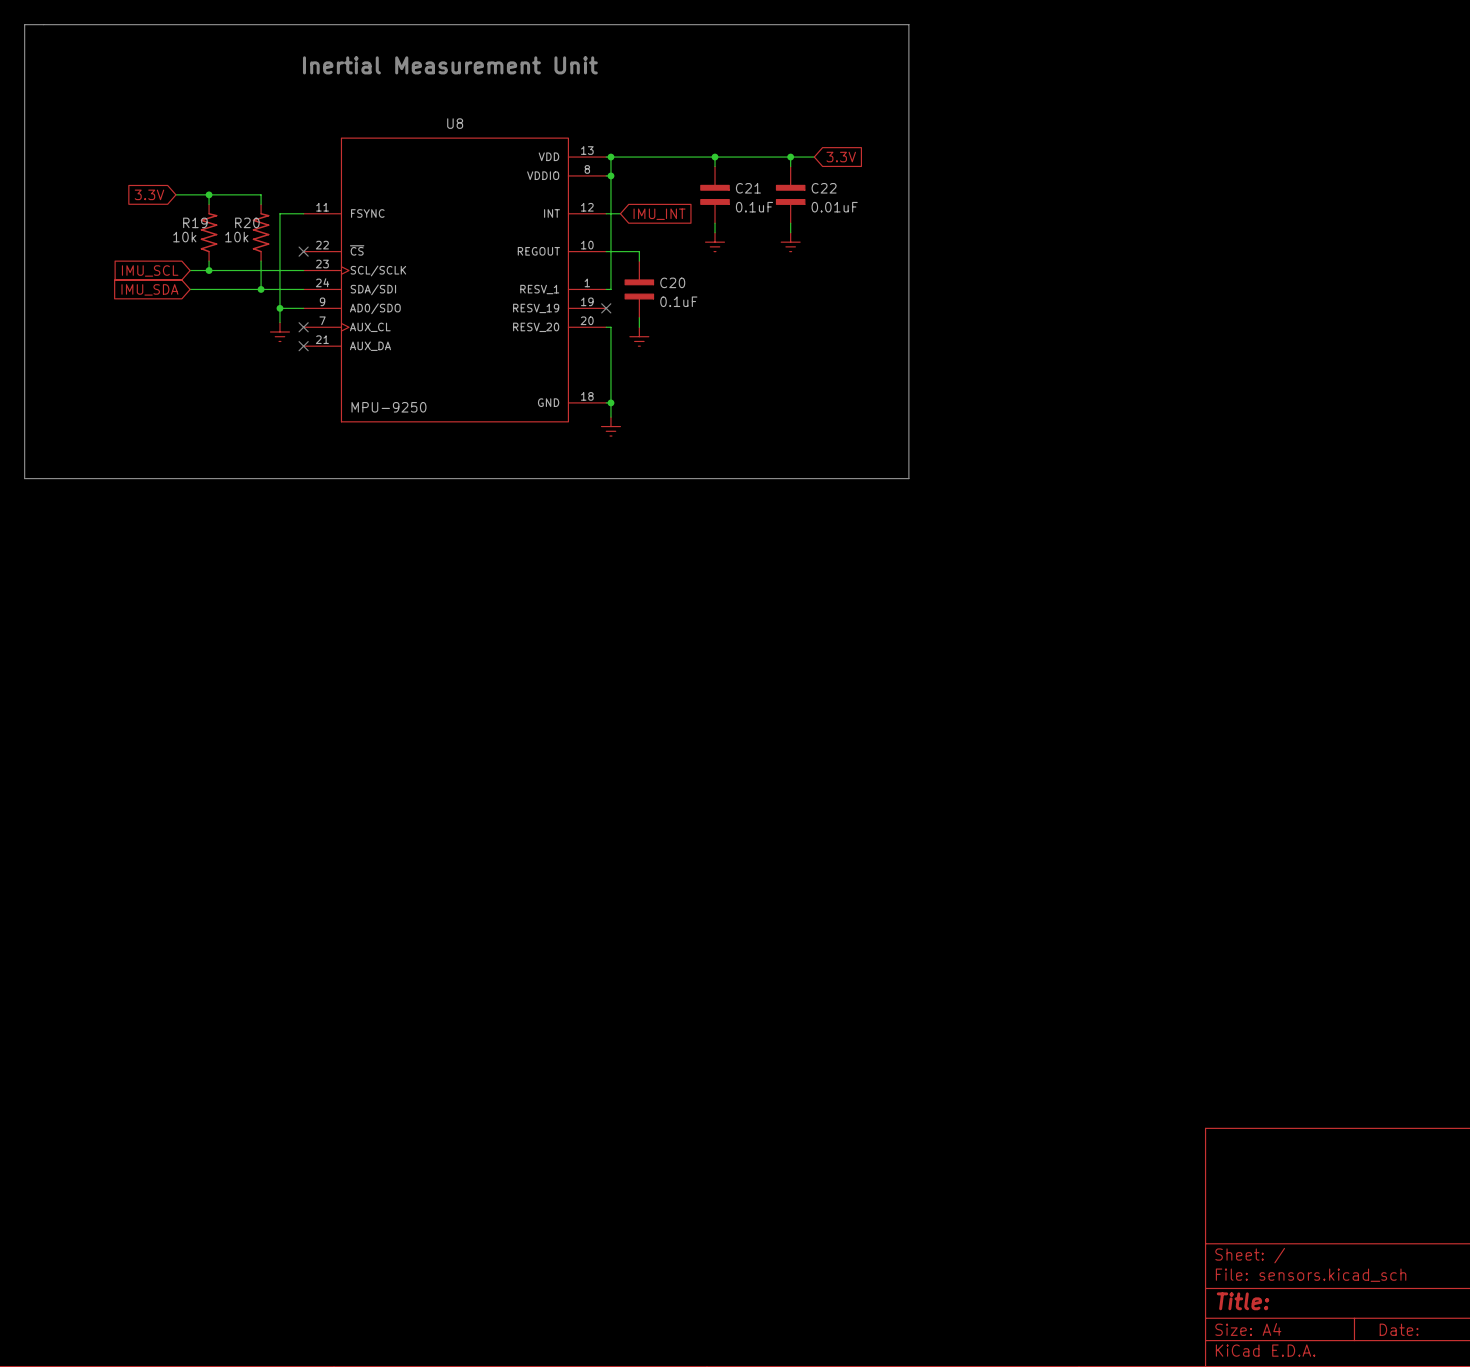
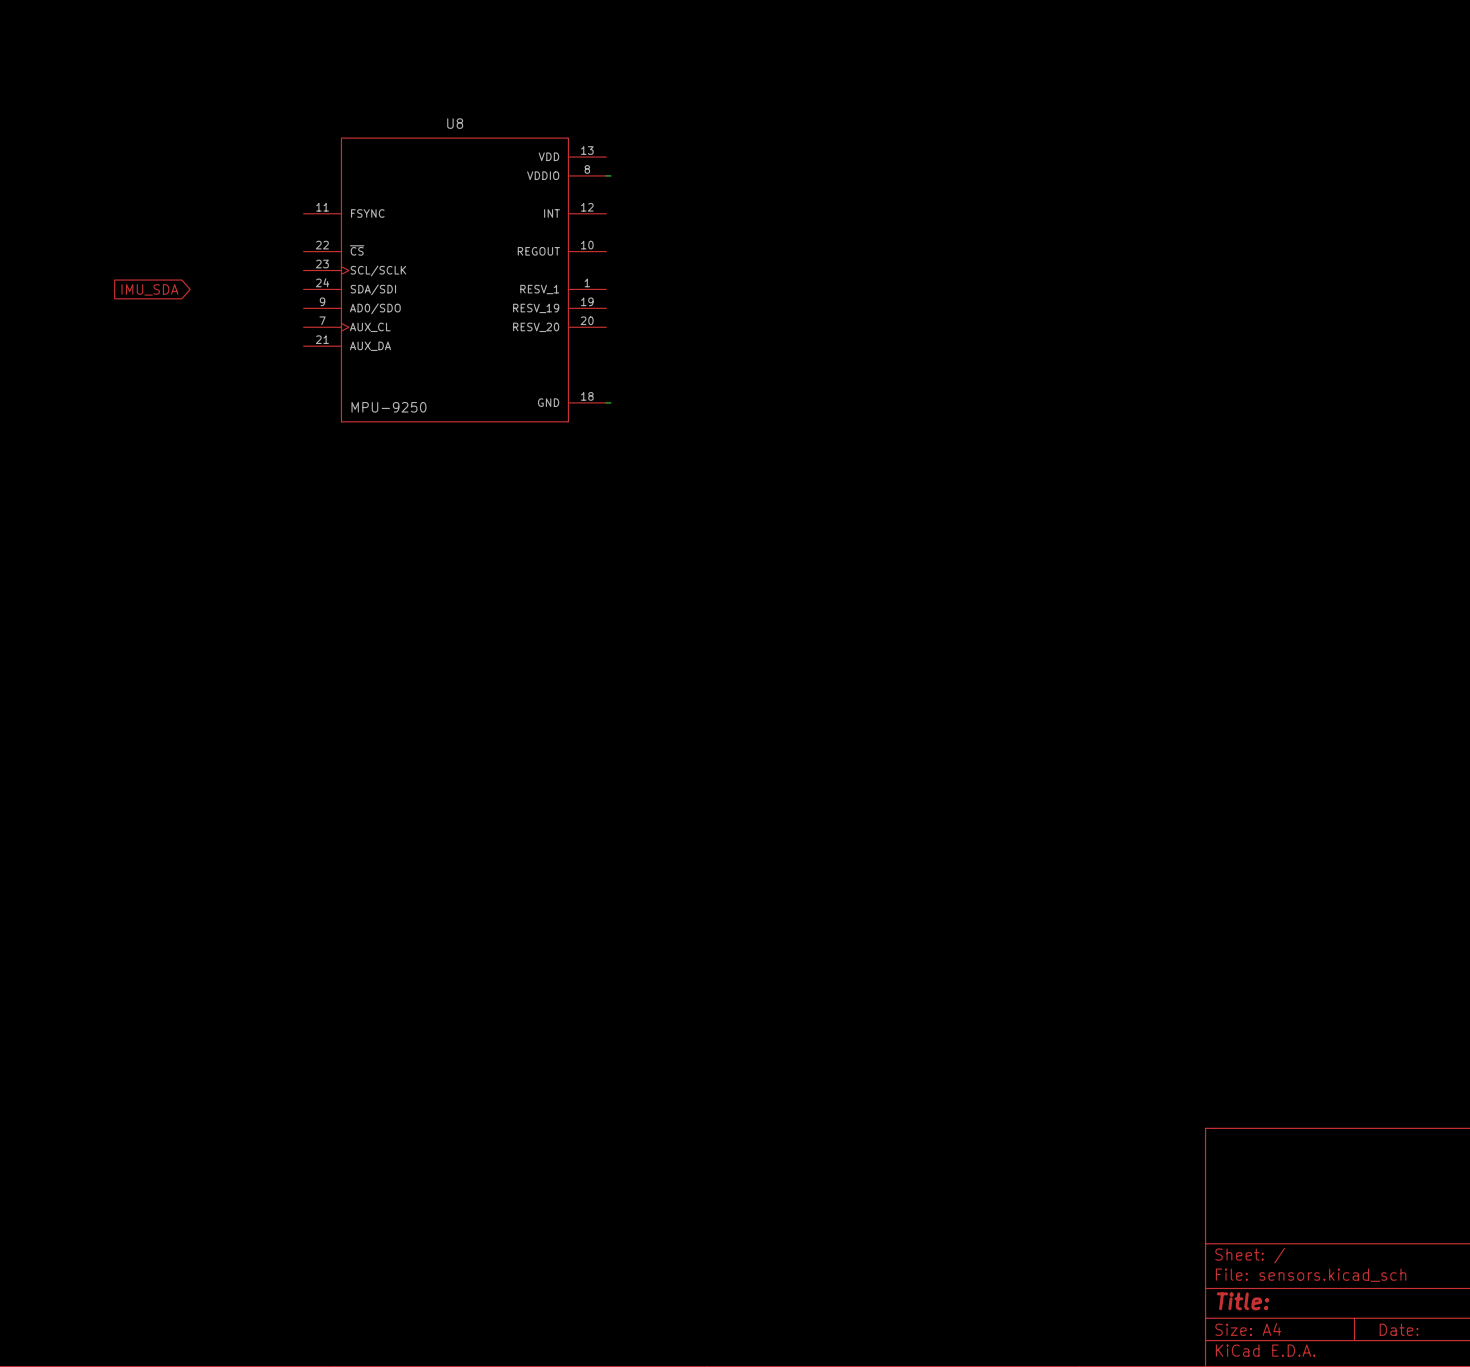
line: (24, 24) (908, 24) (908, 478) (24, 478) (24, 24) -> none
text: Inertial Measurement Unit (450, 65) -> none
wire: (606, 157) (814, 157) -> none
wire: (610, 157) (610, 289) (606, 289) -> none
junction: (610, 157) -> none
wire: (715, 157) (715, 166) -> none
junction: (715, 157) -> none
wire: (790, 157) (790, 166) -> none
junction: (790, 157) -> none
global label: 3.3V (841, 157) -> none
junction: (610, 175) -> none
global label: 3.3V (149, 194) -> none
wire: (175, 194) (261, 194) (261, 204) -> none
wire: (209, 194) (209, 204) -> none
junction: (209, 194) -> none
C21: 0.1uF (715, 194) -> none
C22: 0.01uF (790, 194) -> none
wire: (303, 213) (279, 213) (279, 322) -> none
wire: (606, 213) (620, 213) -> none
global label: IMU_INT (659, 214) -> none
wire: (715, 223) (715, 232) -> none
wire: (790, 223) (790, 232) -> none
R19: 10k (209, 232) -> none
R20: 10k (261, 232) -> none
power symbol: (715, 242) -> none
power symbol: (790, 242) -> none
no-connect mark: (303, 251) -> none
wire: (606, 251) (639, 251) (639, 261) -> none
wire: (209, 261) (209, 270) -> none
wire: (261, 261) (261, 289) -> none
global label: IMU_SCL (150, 270) -> none
wire: (190, 270) (303, 270) -> none
junction: (209, 270) -> none
wire: (190, 289) (303, 289) -> none
junction: (261, 289) -> none
C20: 0.1uF (639, 289) -> none
wire: (279, 308) (303, 308) -> none
junction: (279, 308) -> none
no-connect mark: (606, 308) -> none
wire: (639, 317) (639, 327) -> none
no-connect mark: (303, 327) -> none
wire: (606, 327) (610, 327) (610, 417) -> none
power symbol: (279, 331) -> none
power symbol: (639, 336) -> none
no-connect mark: (303, 346) -> none
junction: (610, 402) -> none
power symbol: (610, 426) -> none

